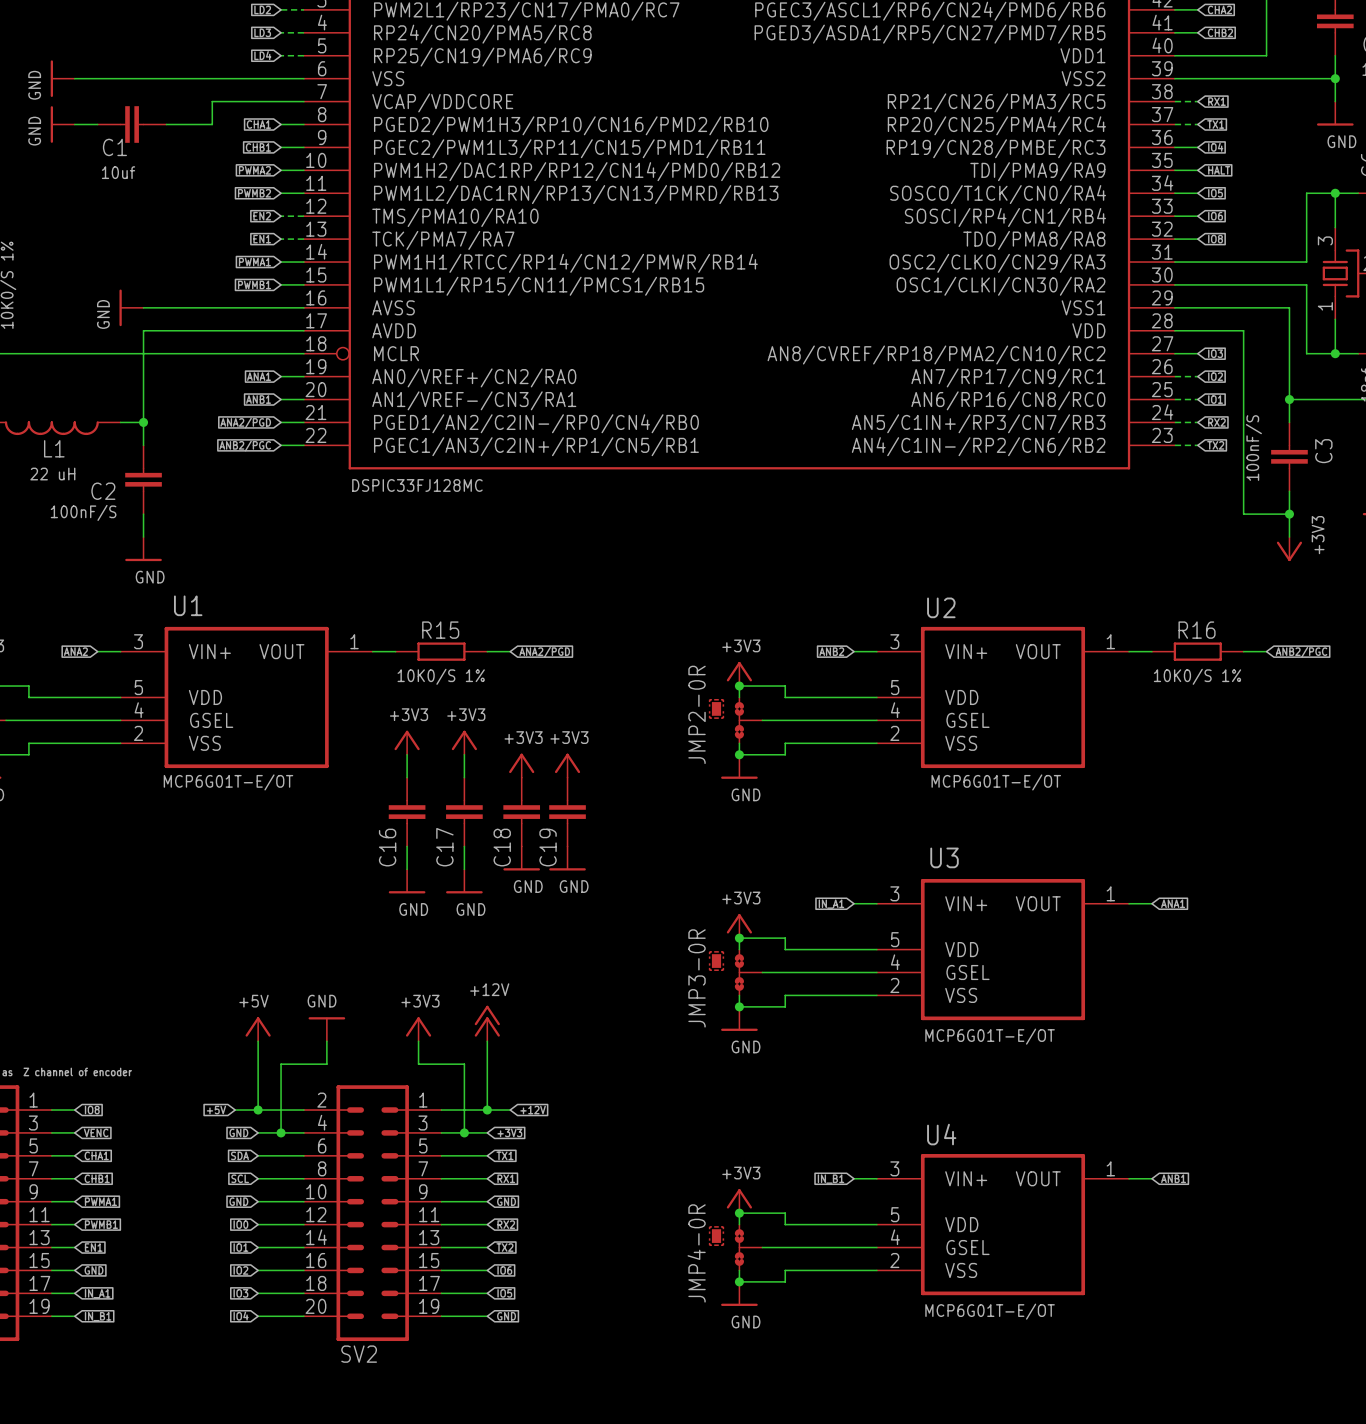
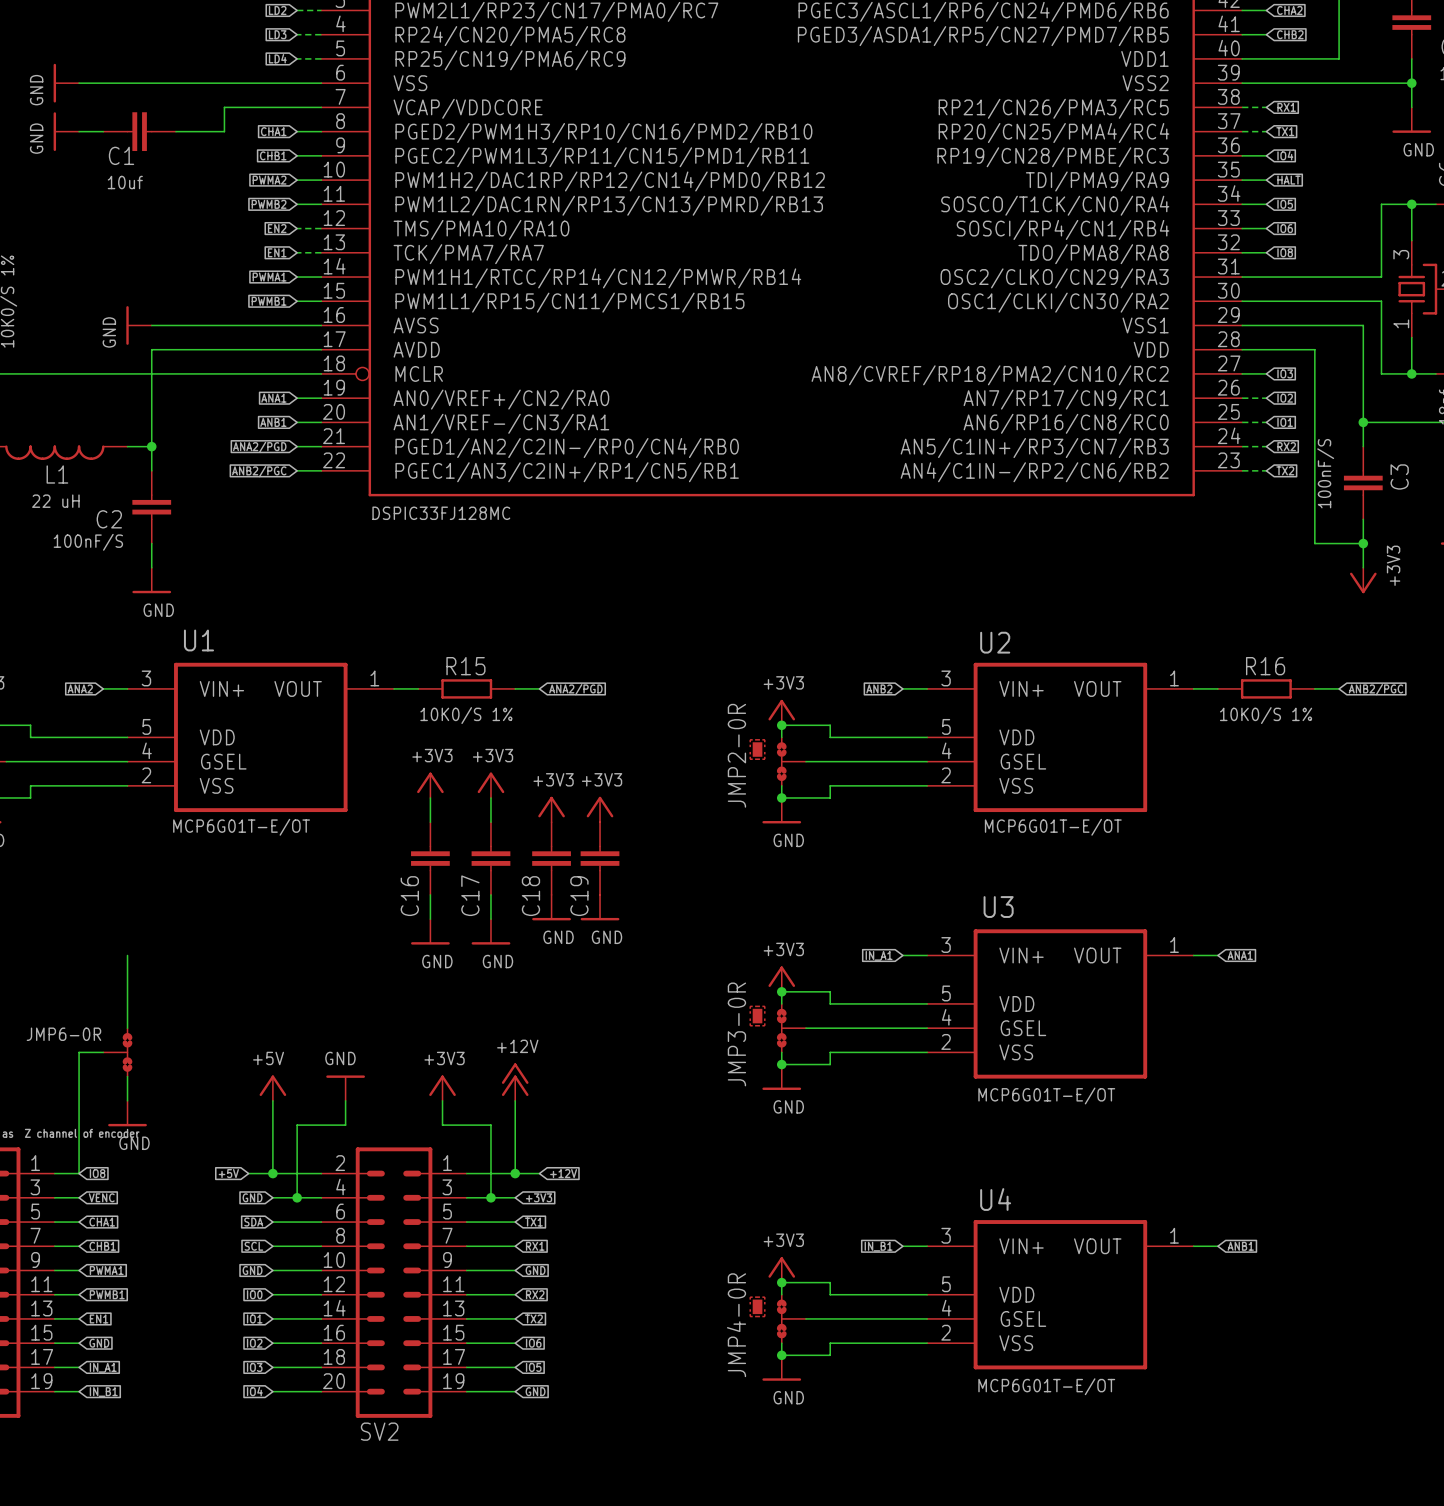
wire: none -> (127, 955) (127, 1028)
wire: none -> (103, 1052) (79, 1052) (79, 1173)
JMP6-0R: none -> (117, 1052)
wire: none -> (127, 1076) (127, 1100)
power symbol: none -> GND (127, 1113)

